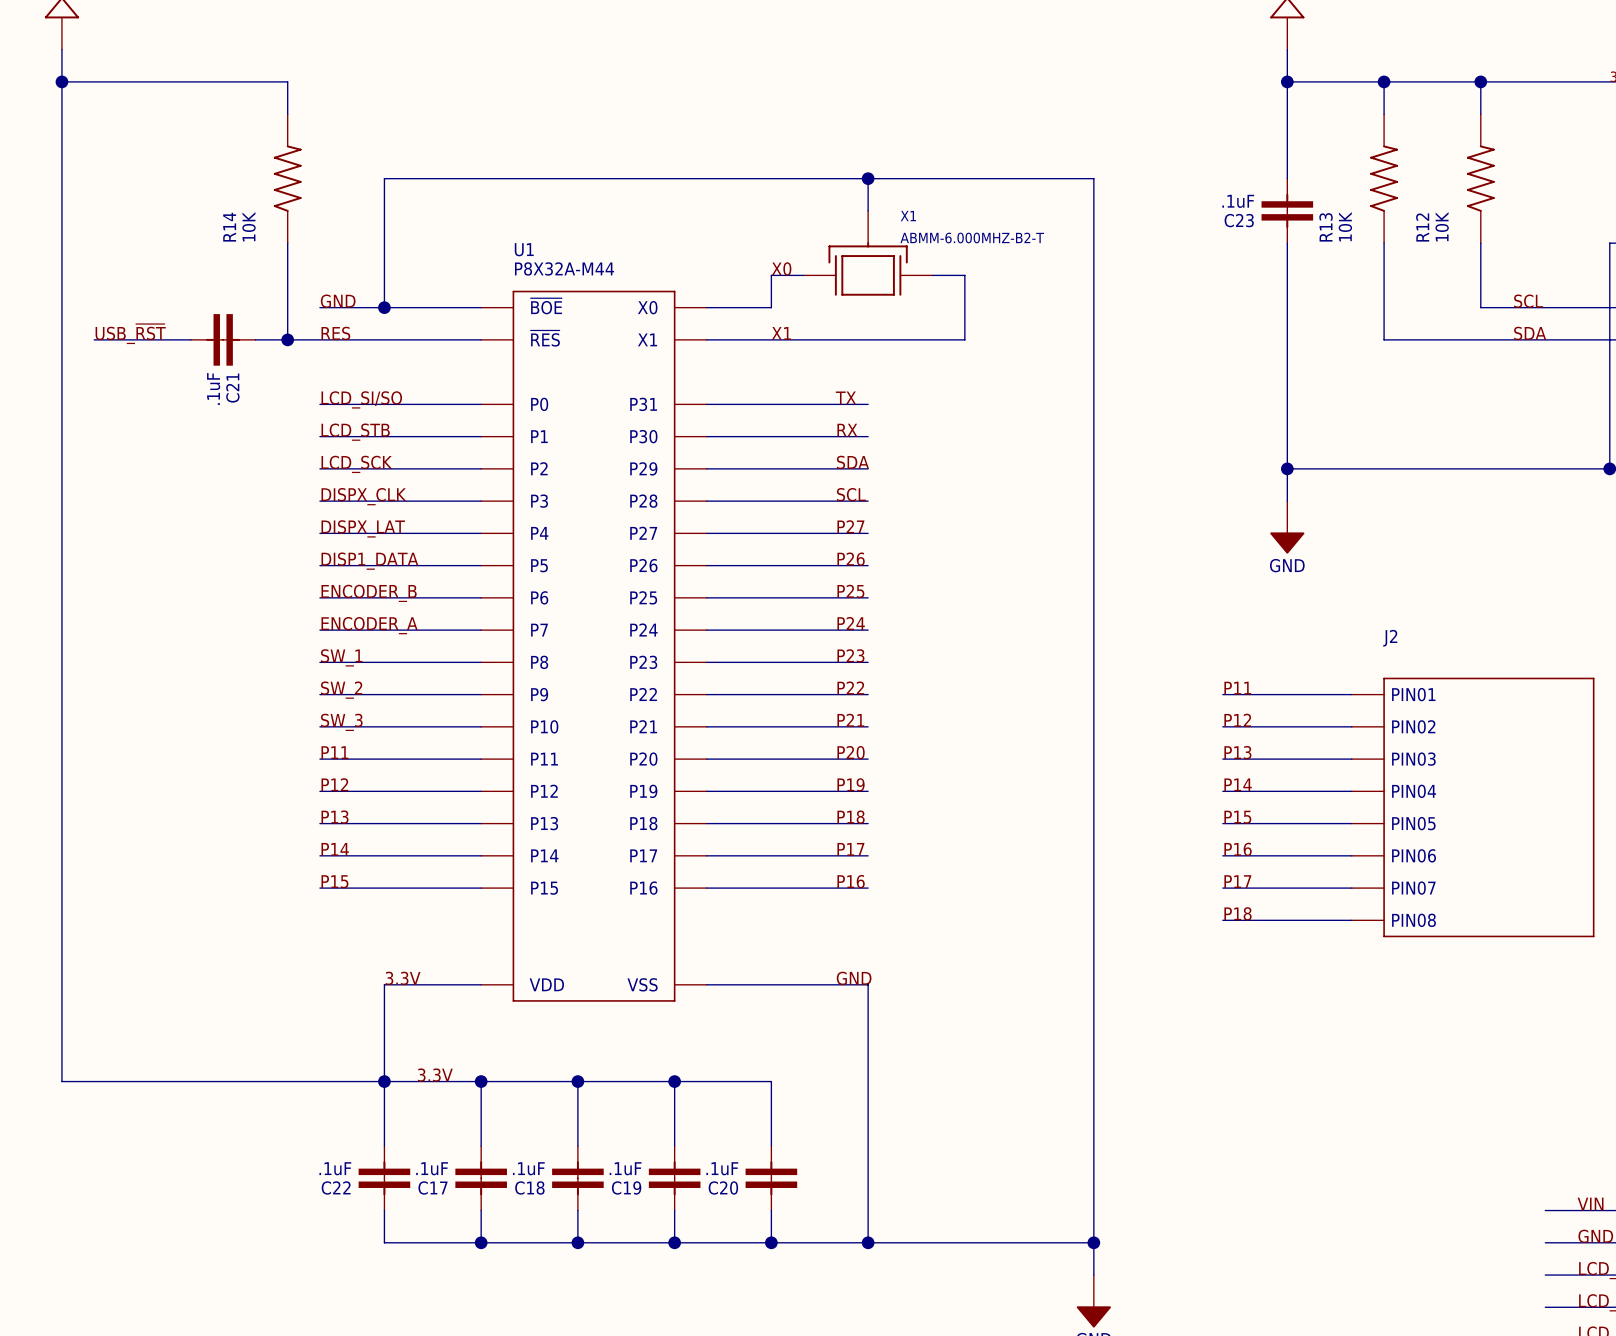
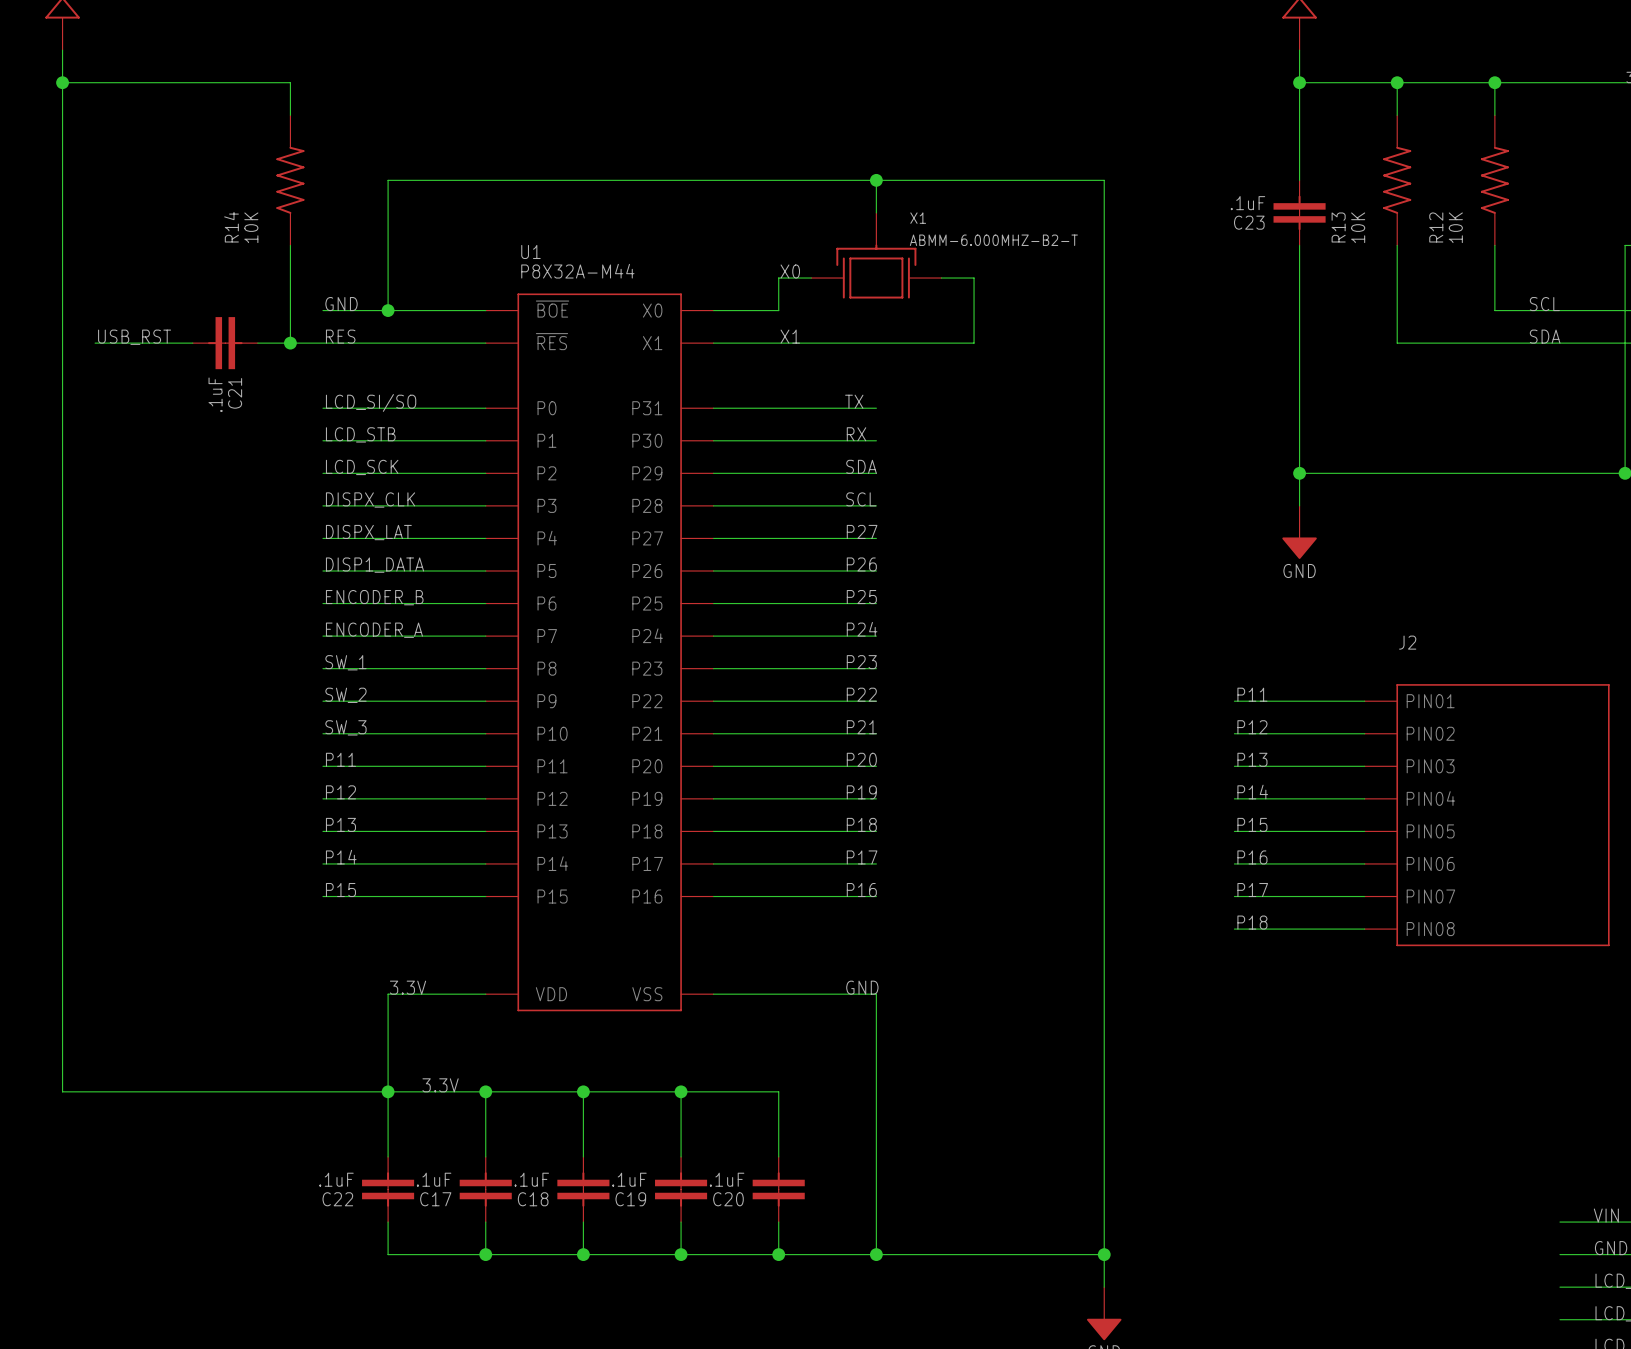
label: USB_~{RST} (130, 334) -> USB_RST (134, 337)

